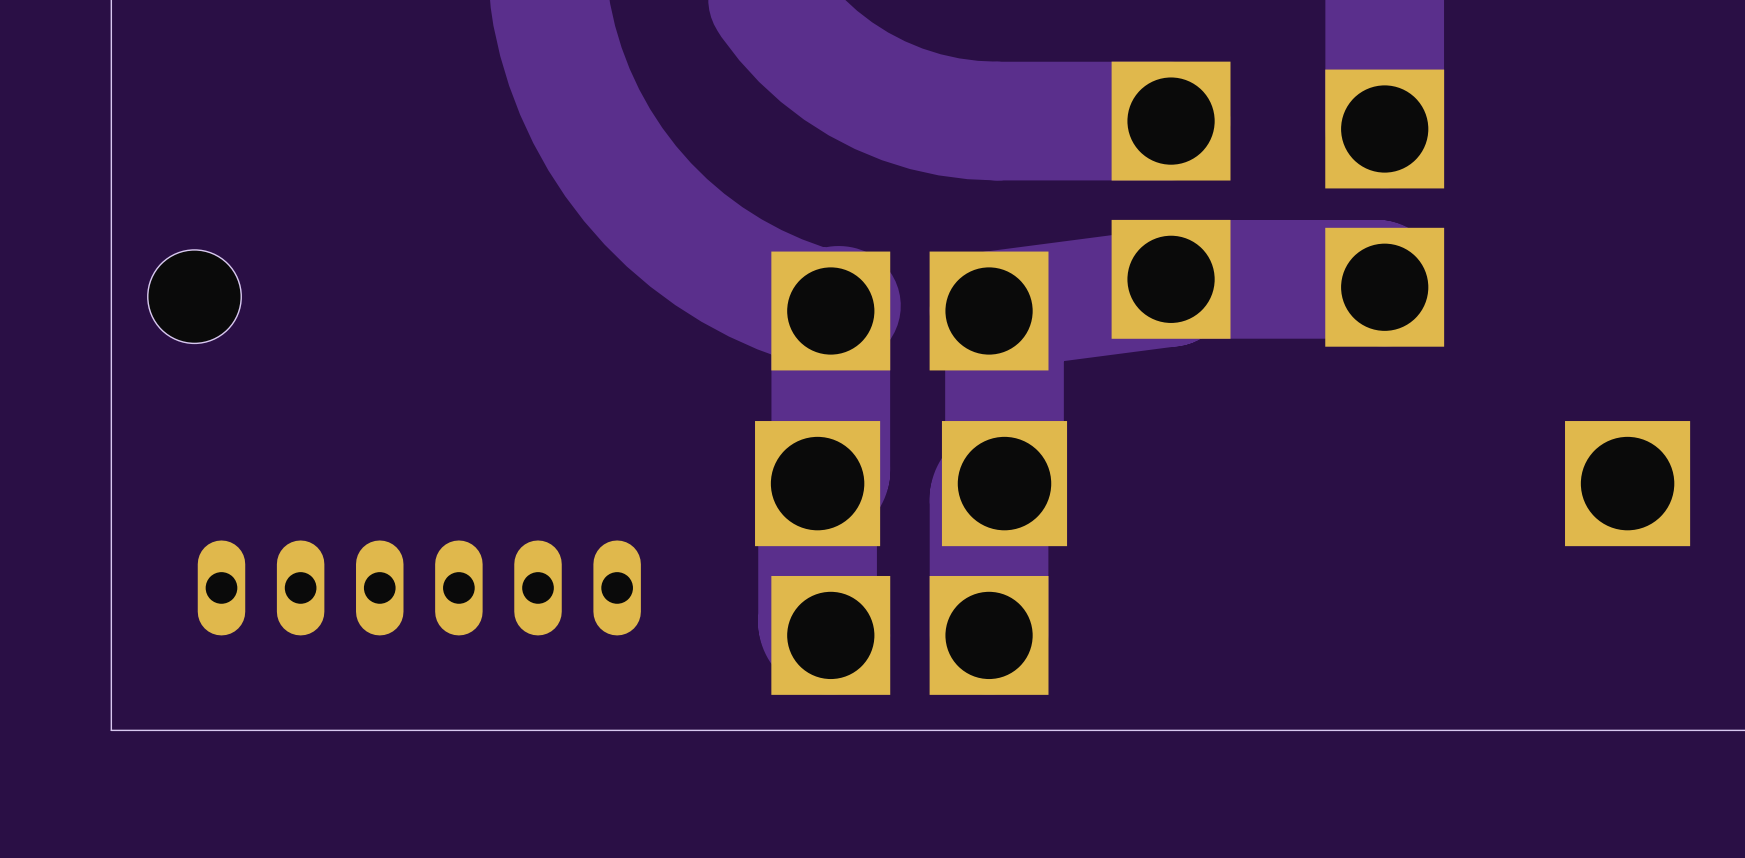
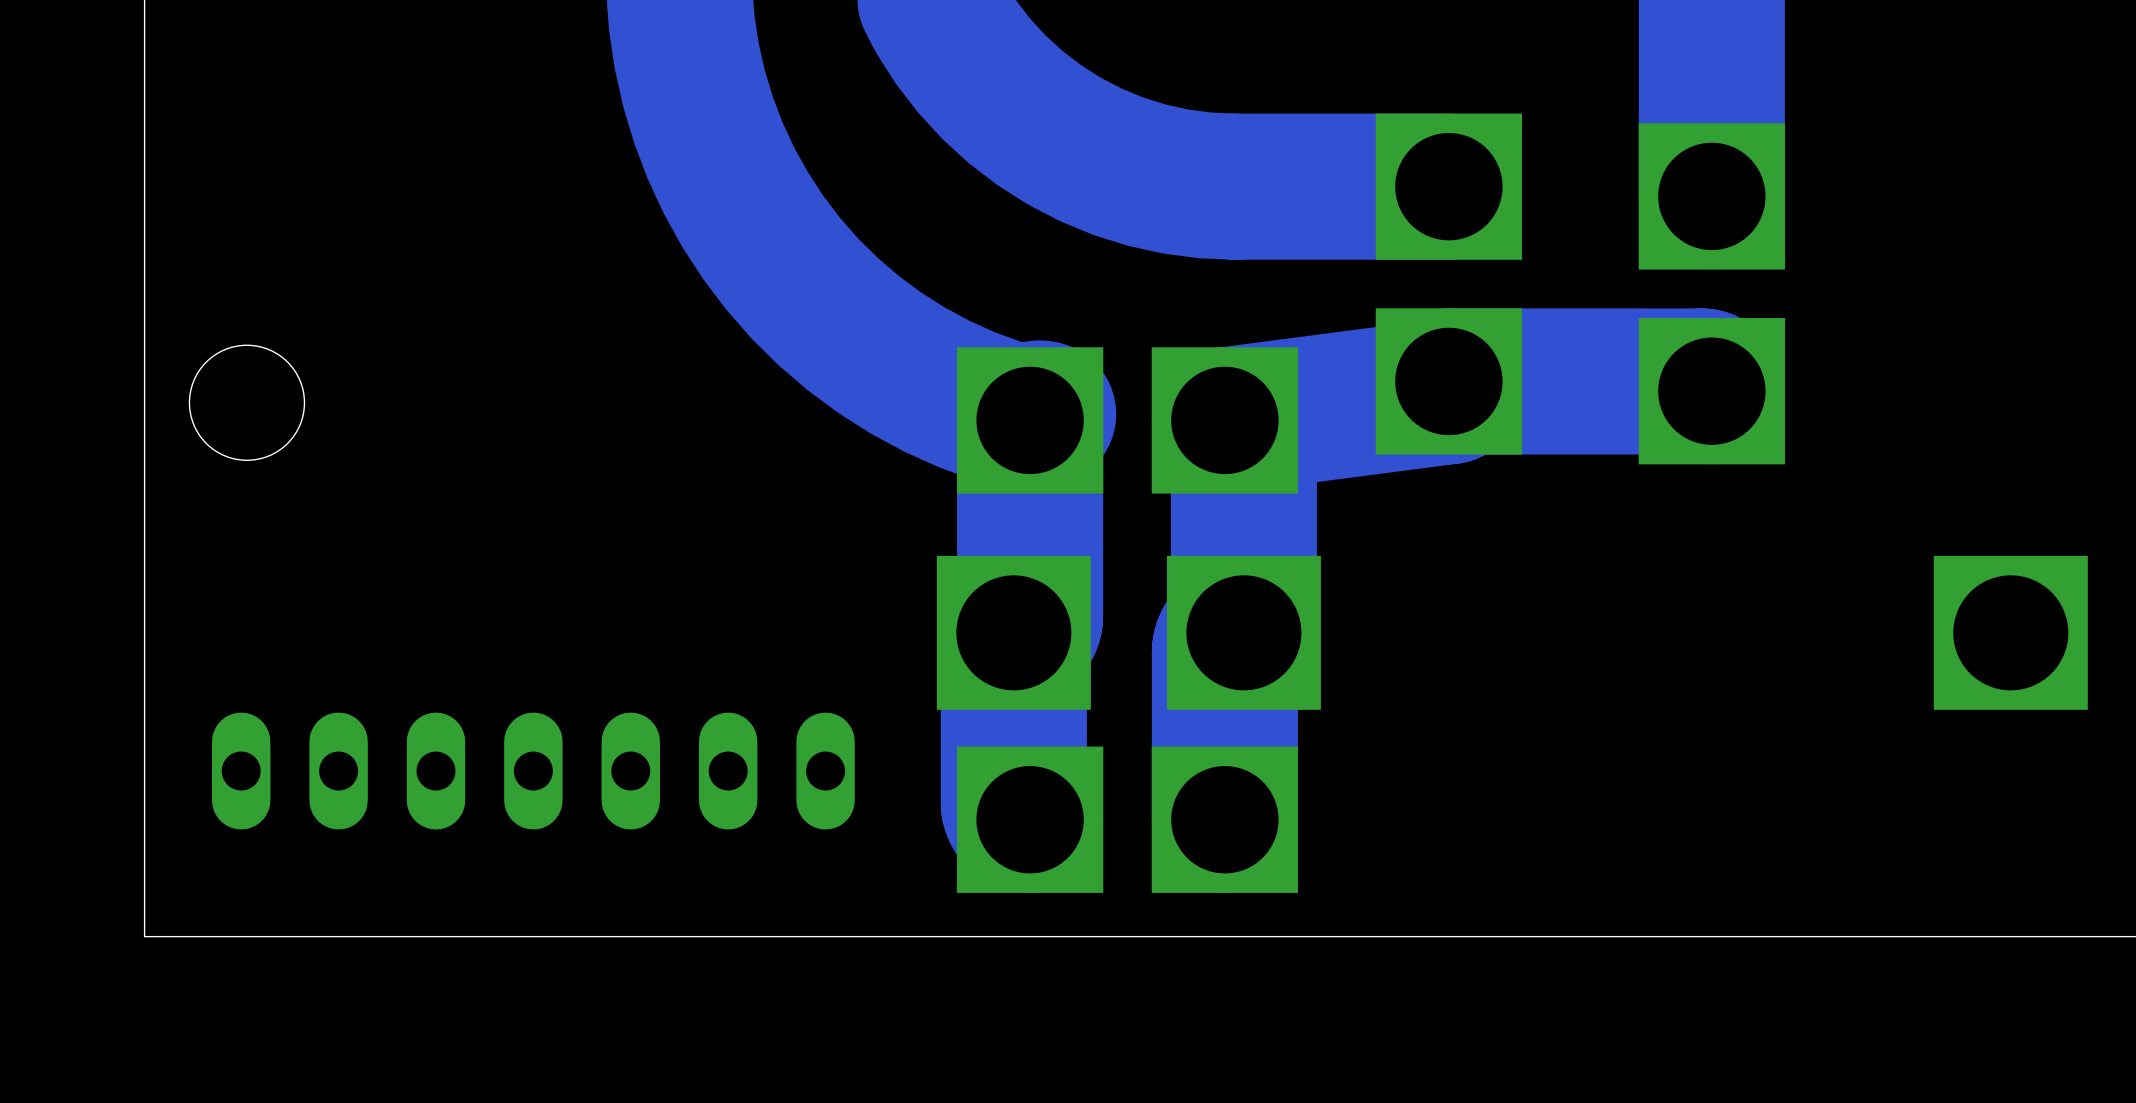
part footprint: [197, 540, 641, 636] -> [211, 712, 855, 830]

